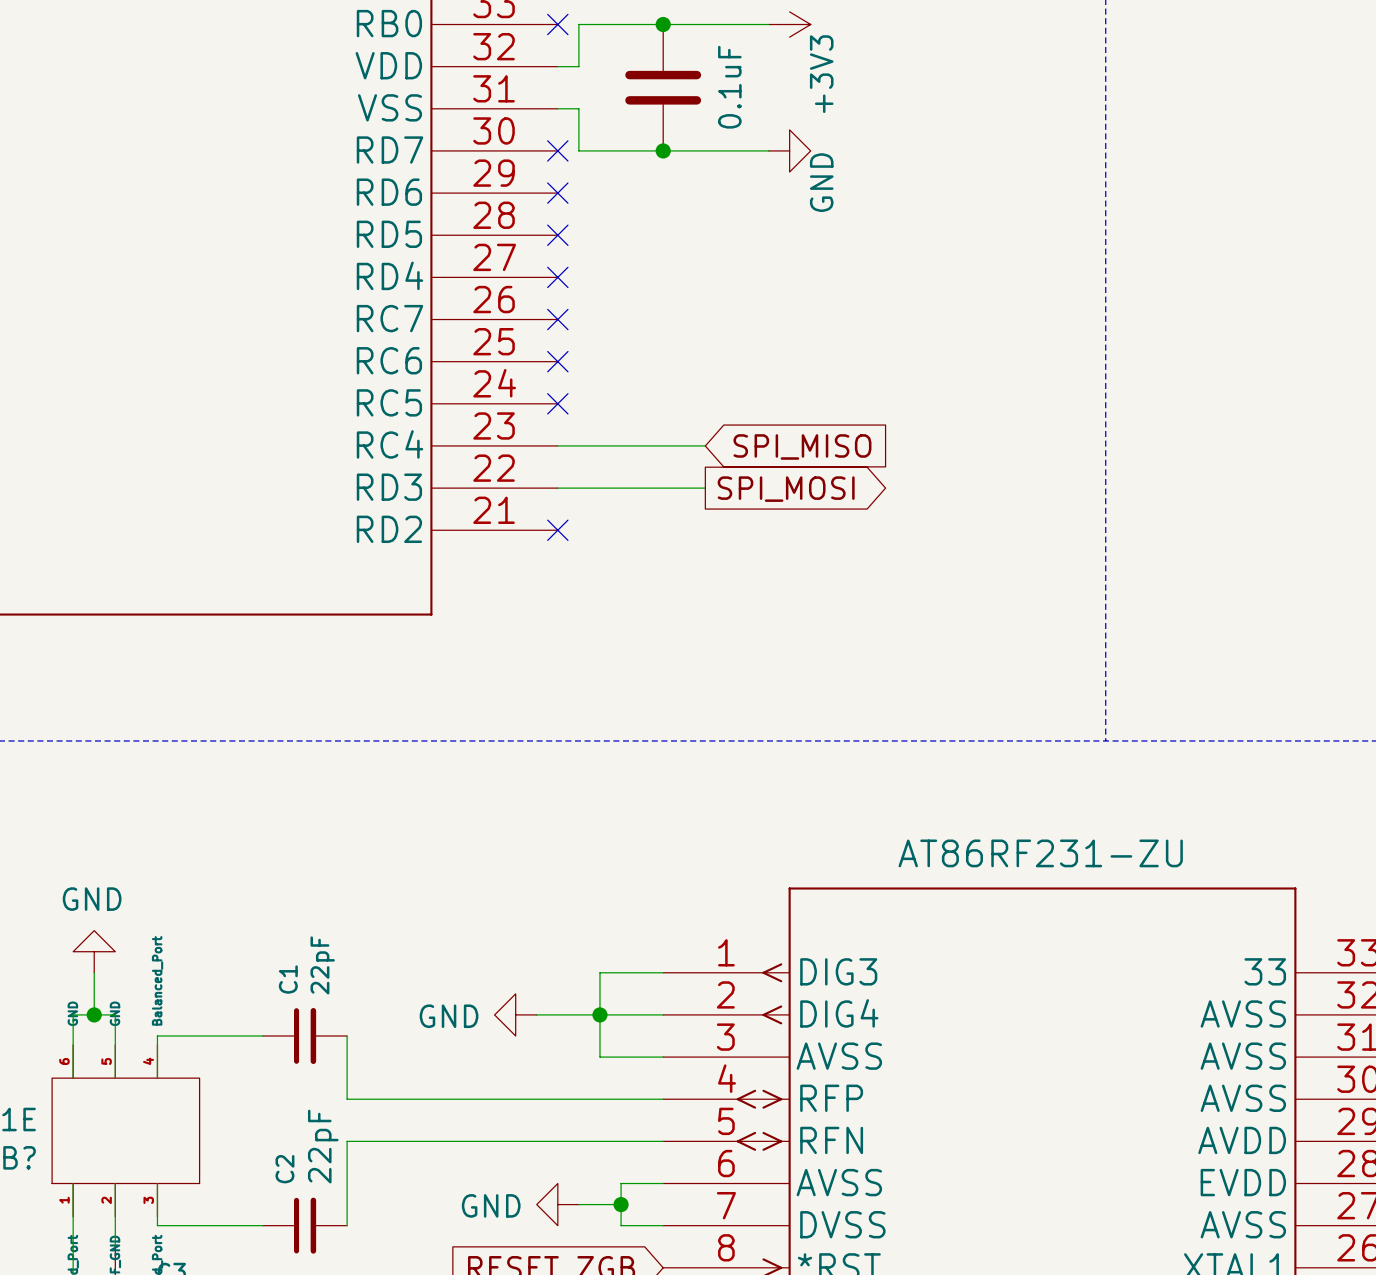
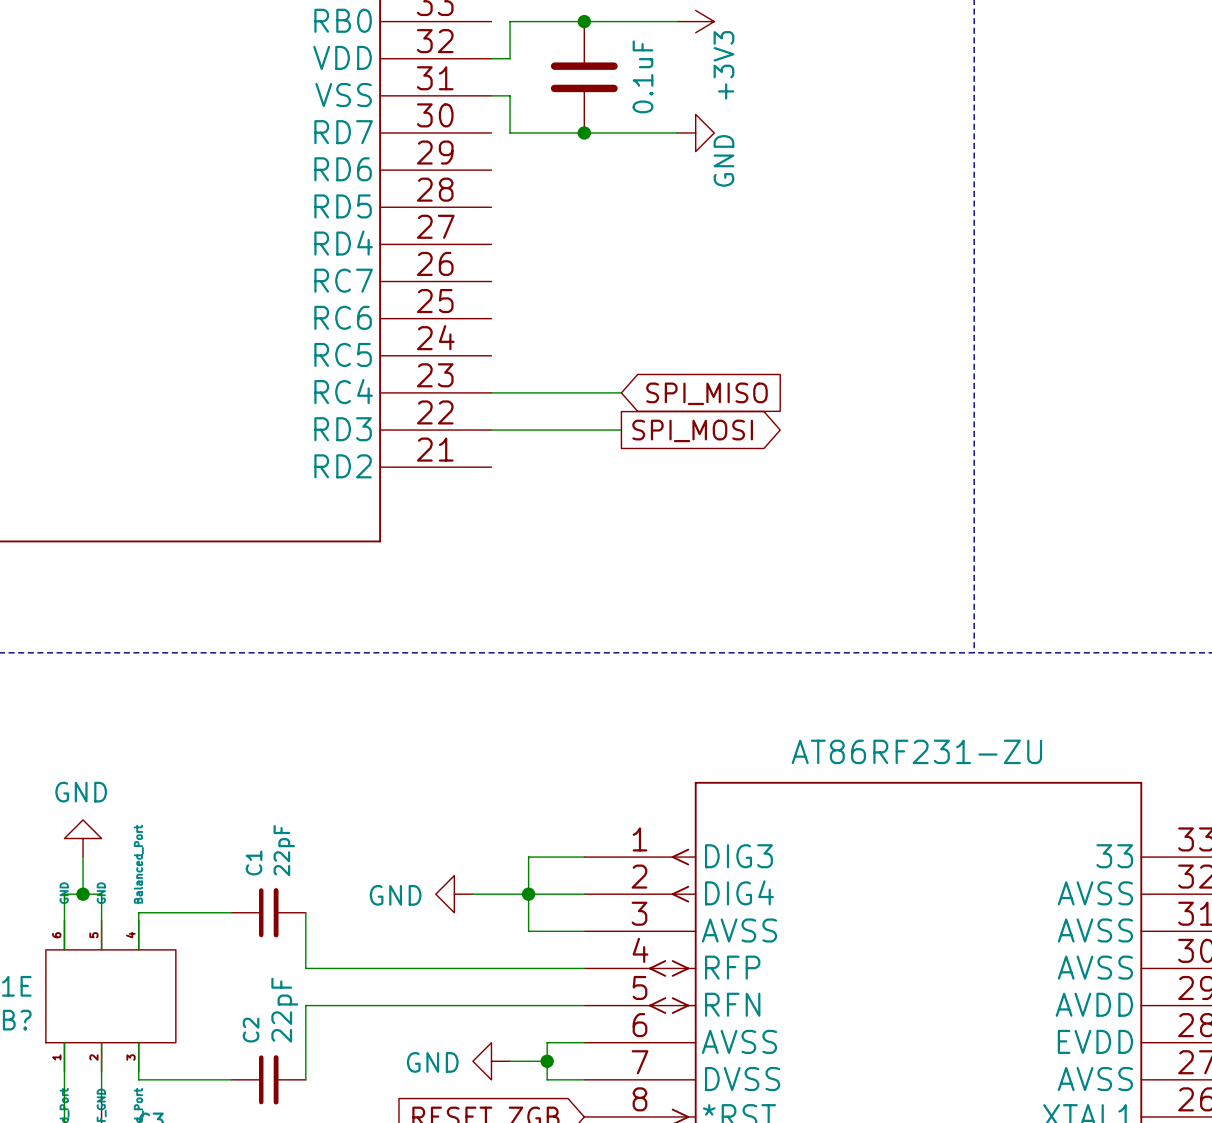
no-connect mark: (557, 24) -> none
no-connect mark: (557, 150) -> none
no-connect mark: (557, 193) -> none
no-connect mark: (557, 235) -> none
no-connect mark: (557, 277) -> none
no-connect mark: (557, 319) -> none
no-connect mark: (557, 361) -> none
no-connect mark: (557, 403) -> none
no-connect mark: (557, 530) -> none

